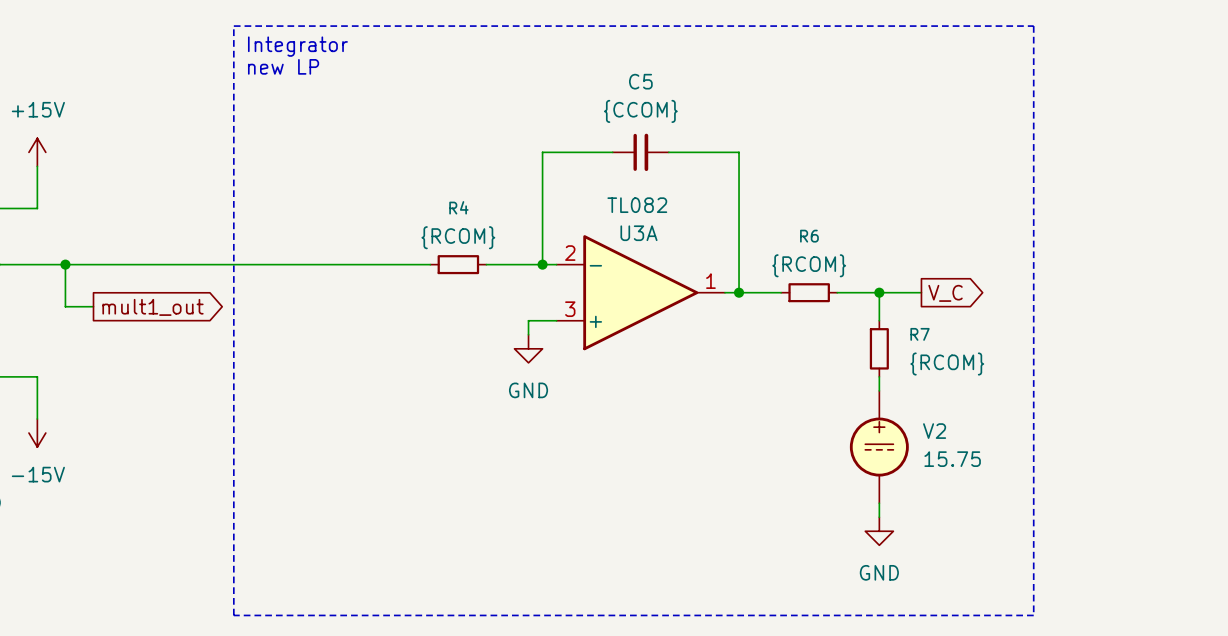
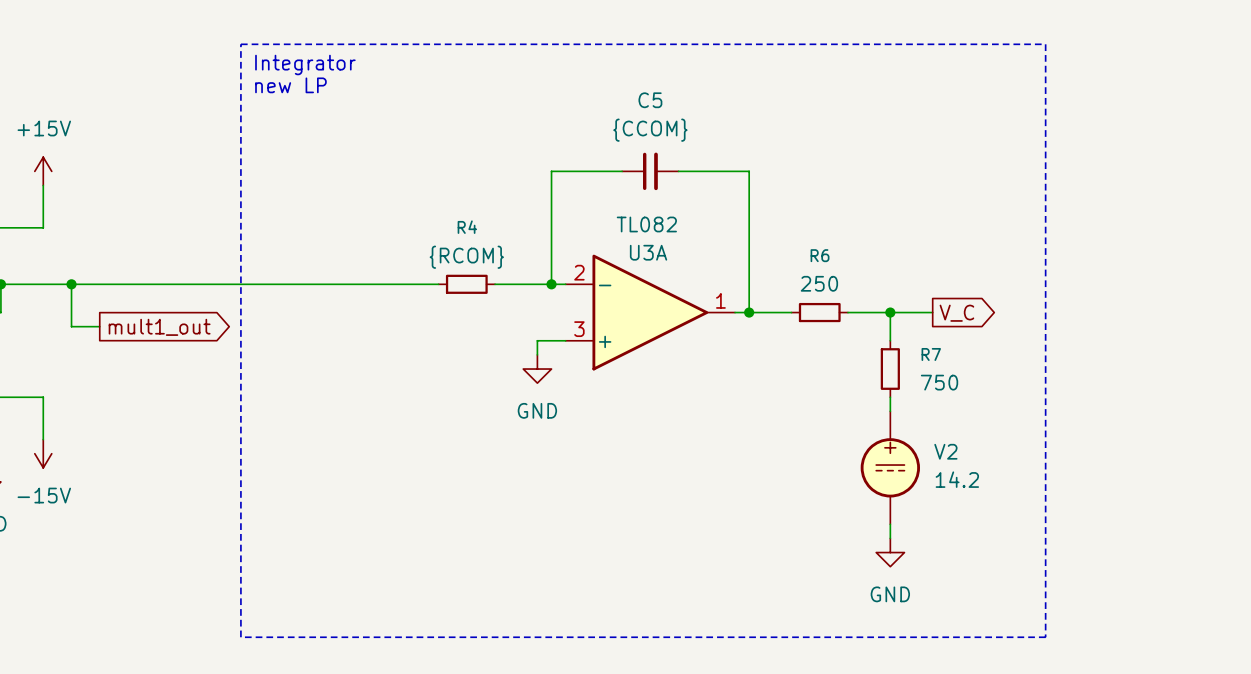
R6 value: {RCOM} (809, 265) -> 250 (819, 283)
R7 value: {RCOM} (947, 364) -> 750 (939, 382)
V2 value: 15.75 (952, 459) -> 14.2 (957, 479)

